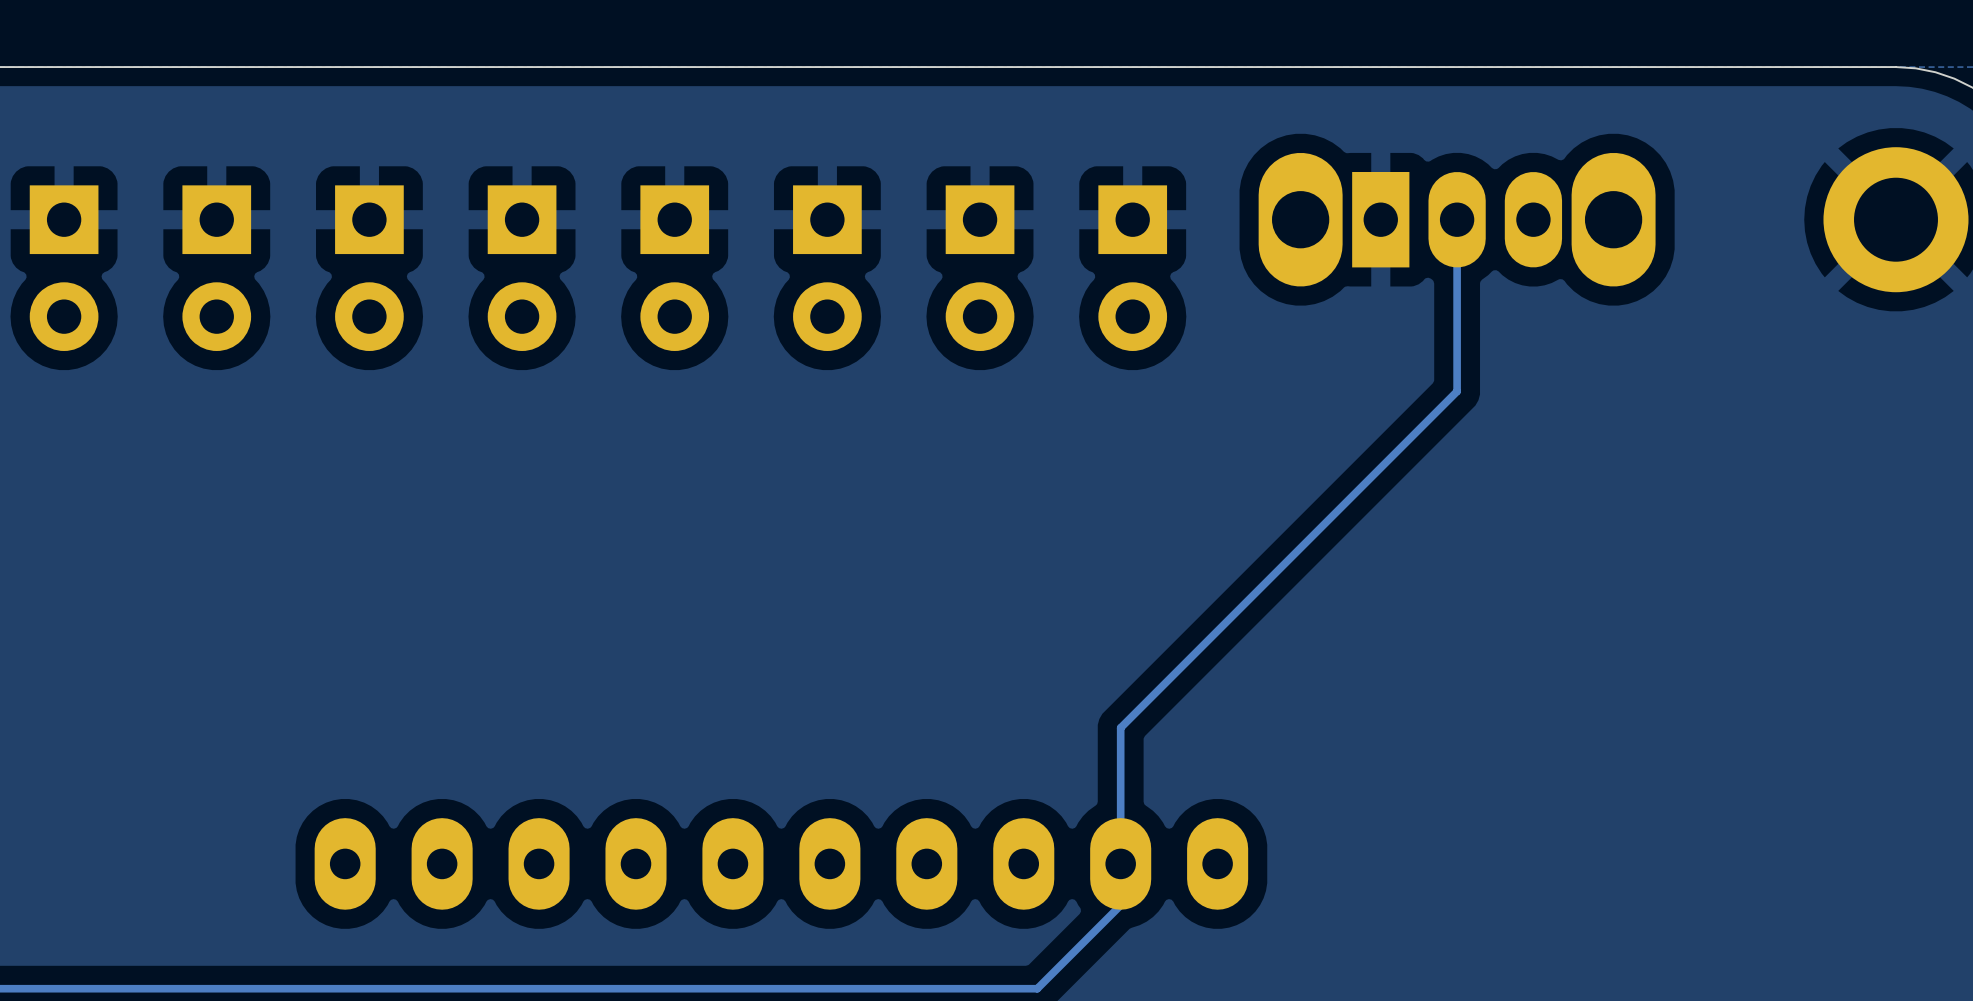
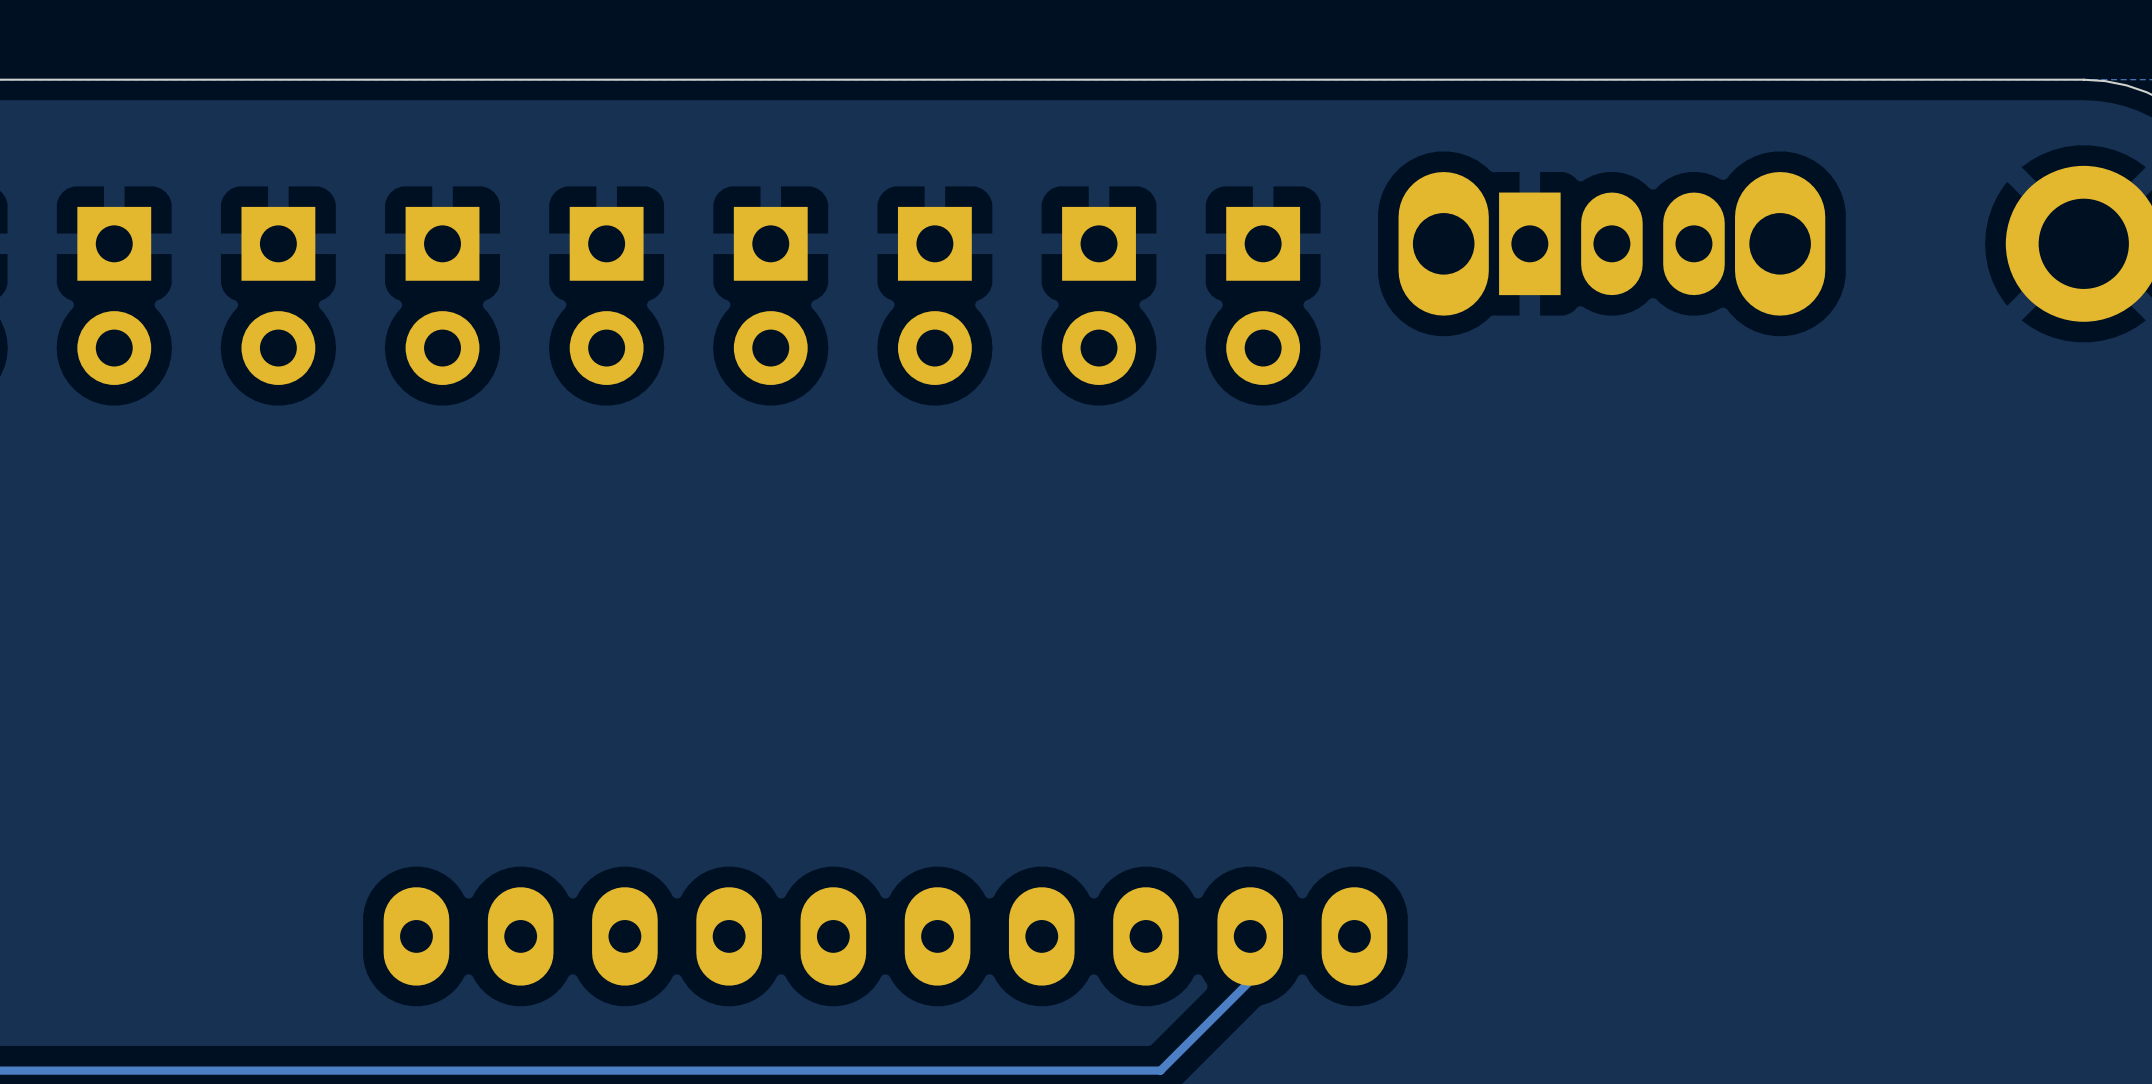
track: (1457, 219) (1457, 391) (1120, 727) (1120, 863) -> none

